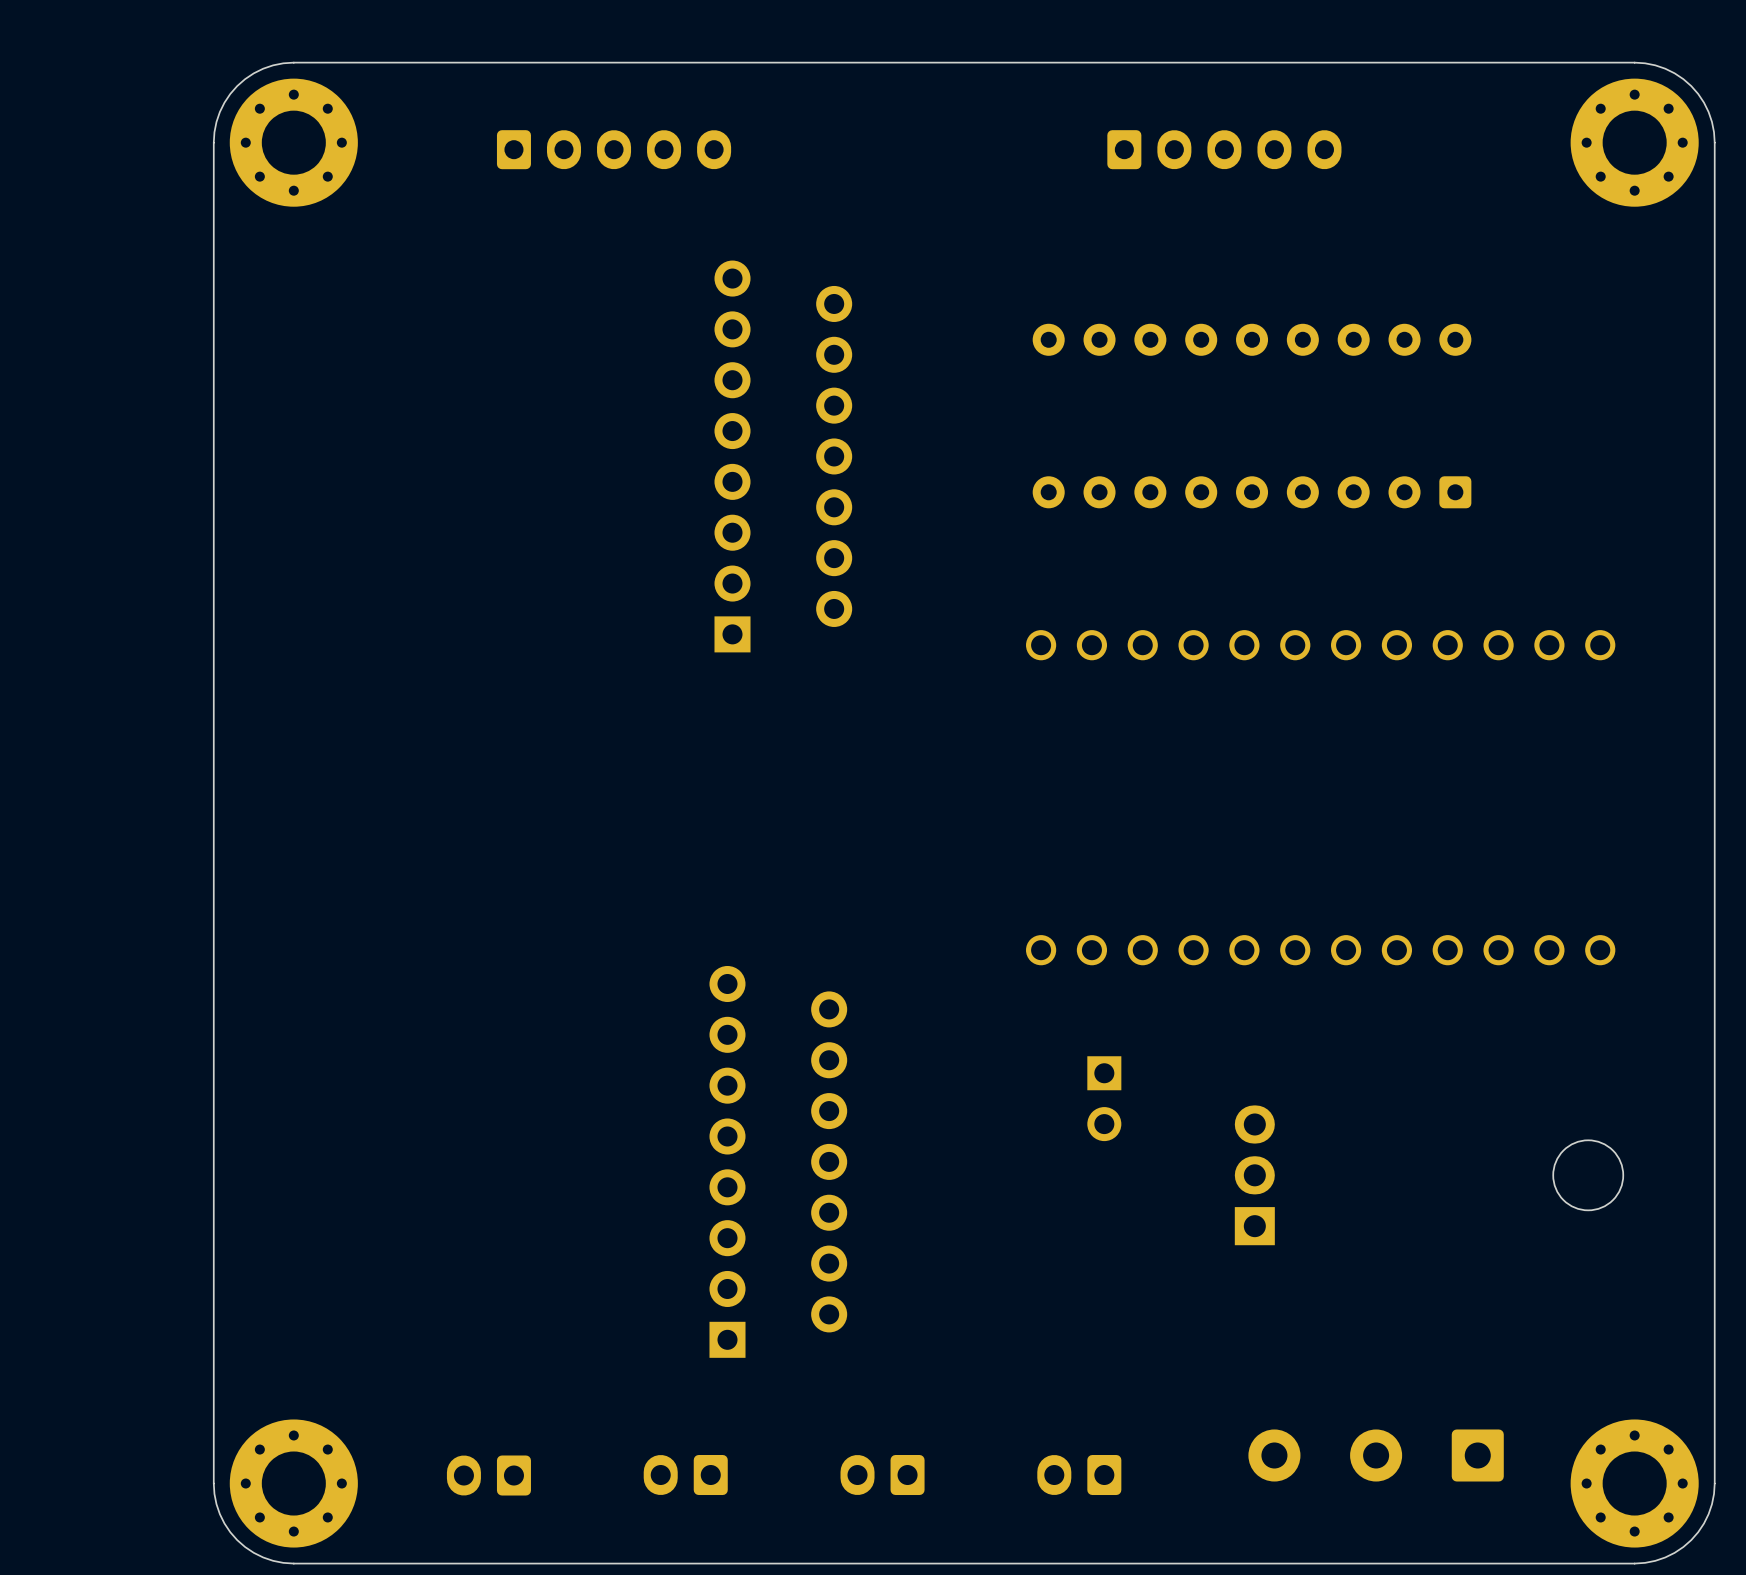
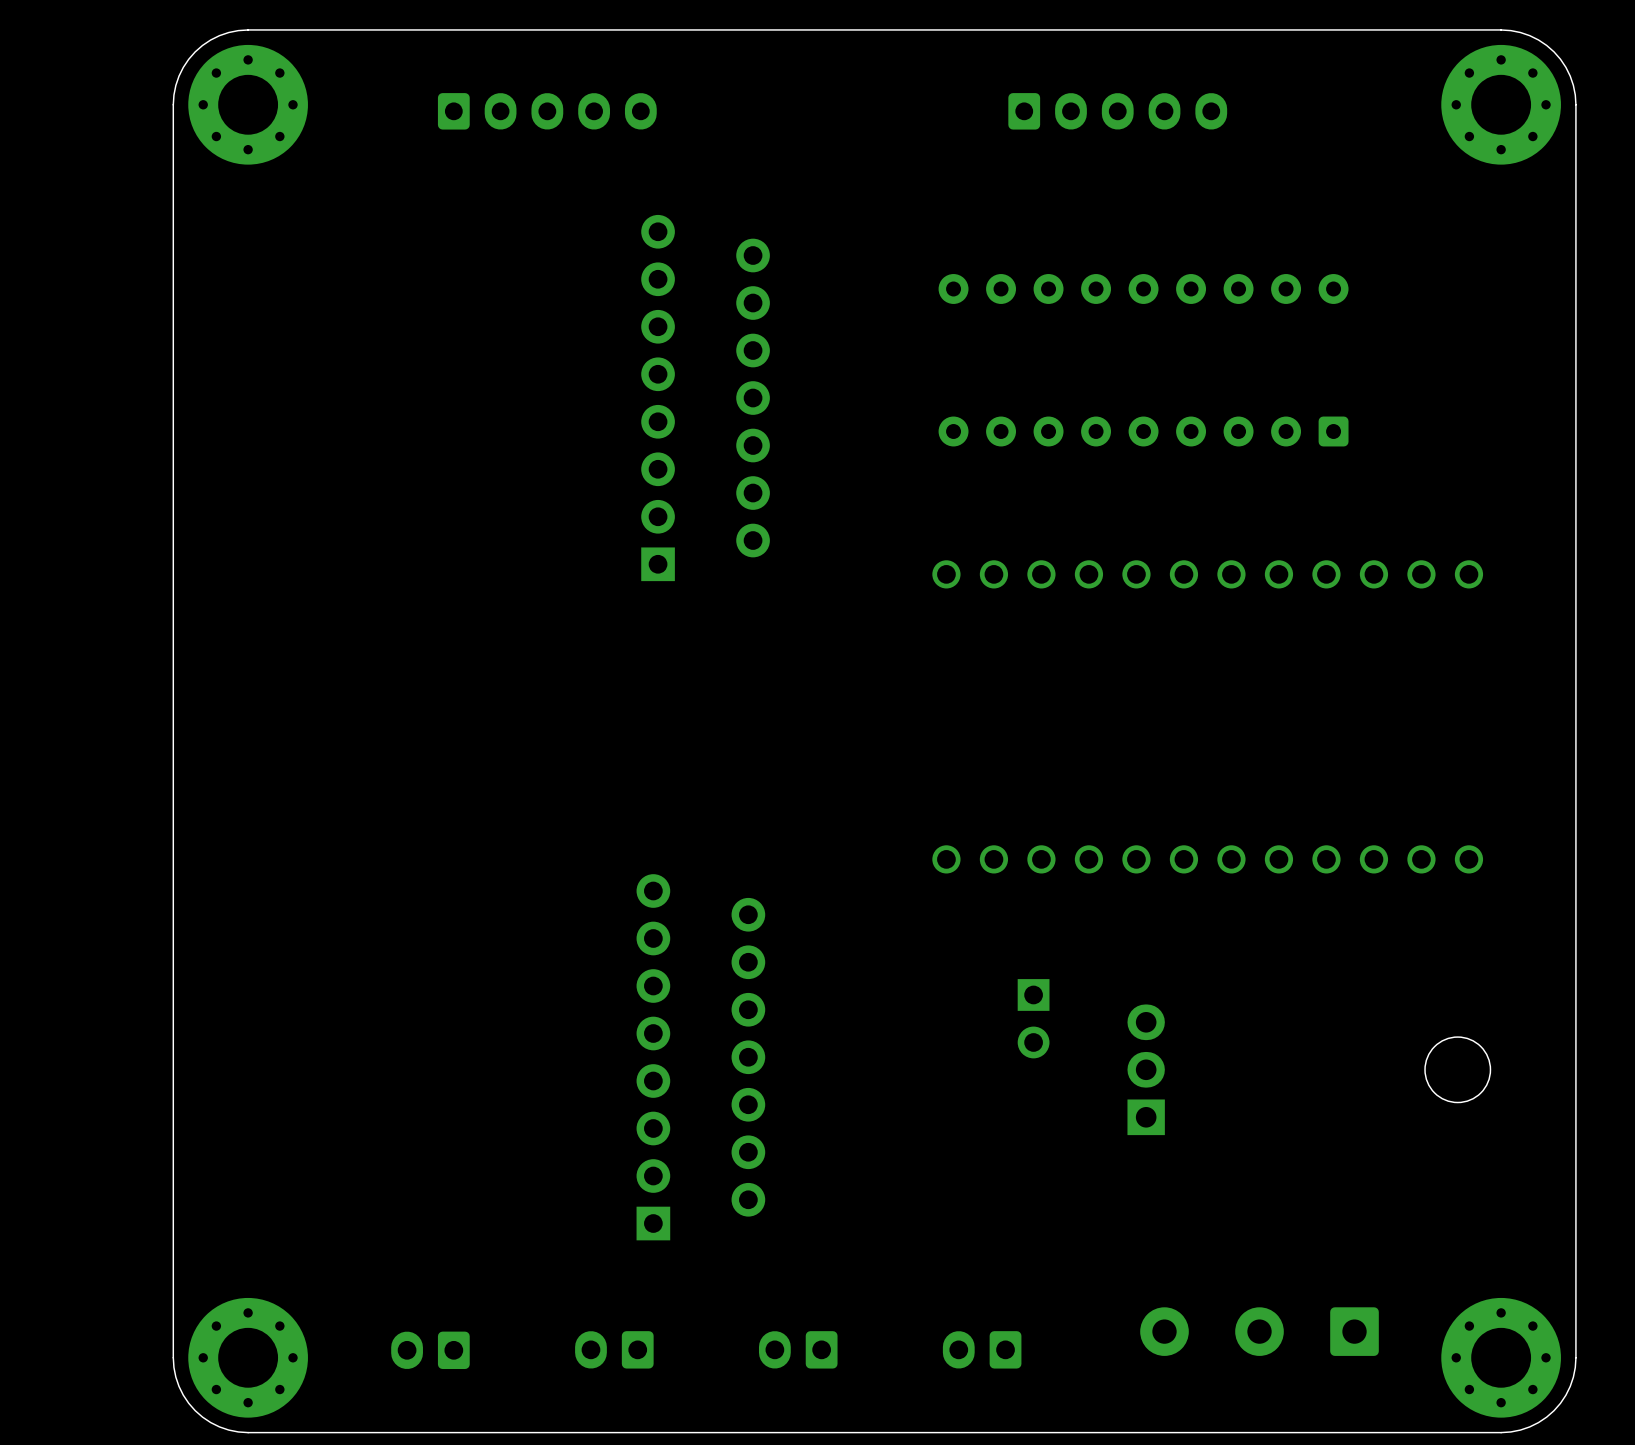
part position: (1104, 1098) -> (1033, 1018)

